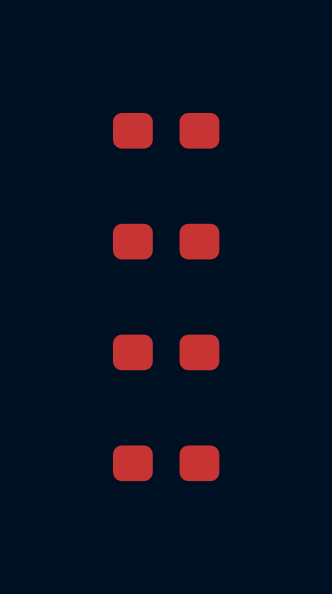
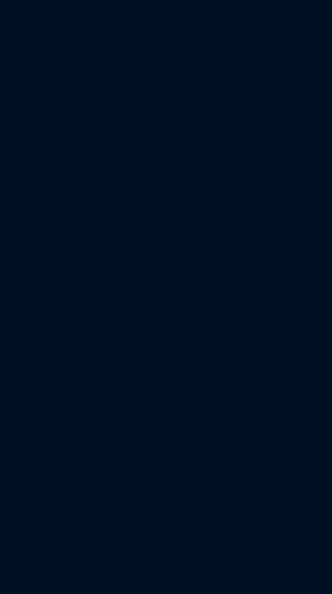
part: (166, 130) -> none
part: (166, 241) -> none
part: (166, 352) -> none
part: (166, 463) -> none

